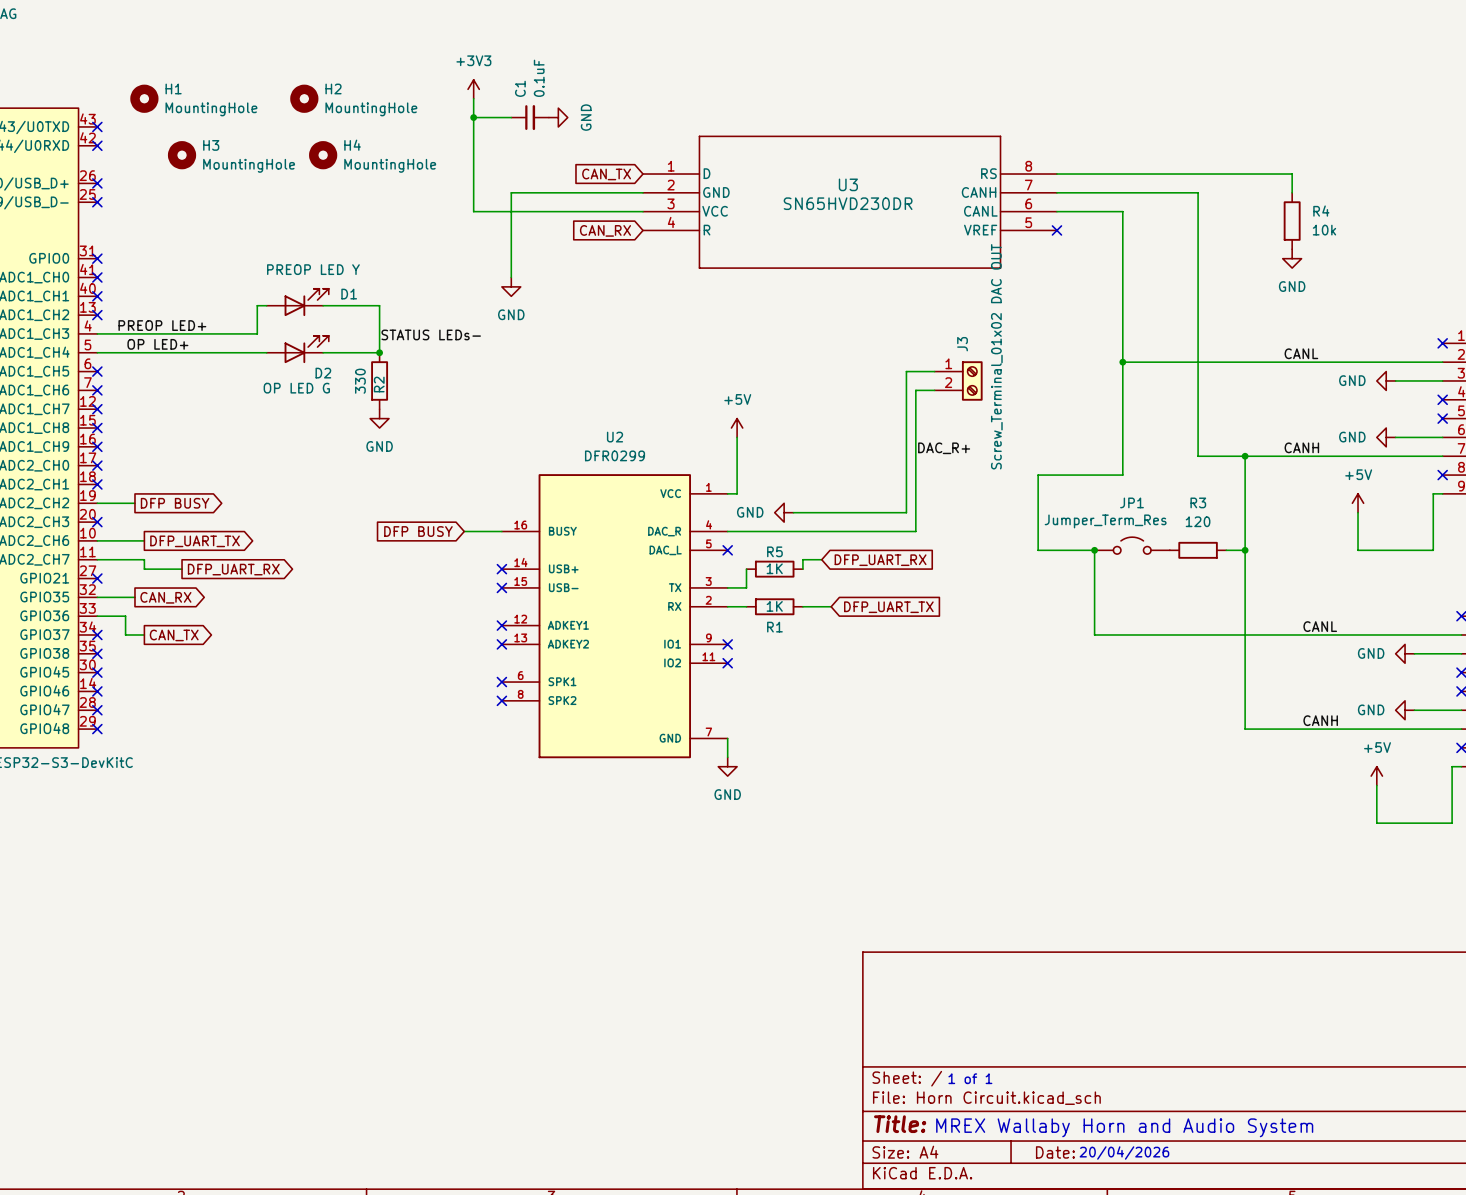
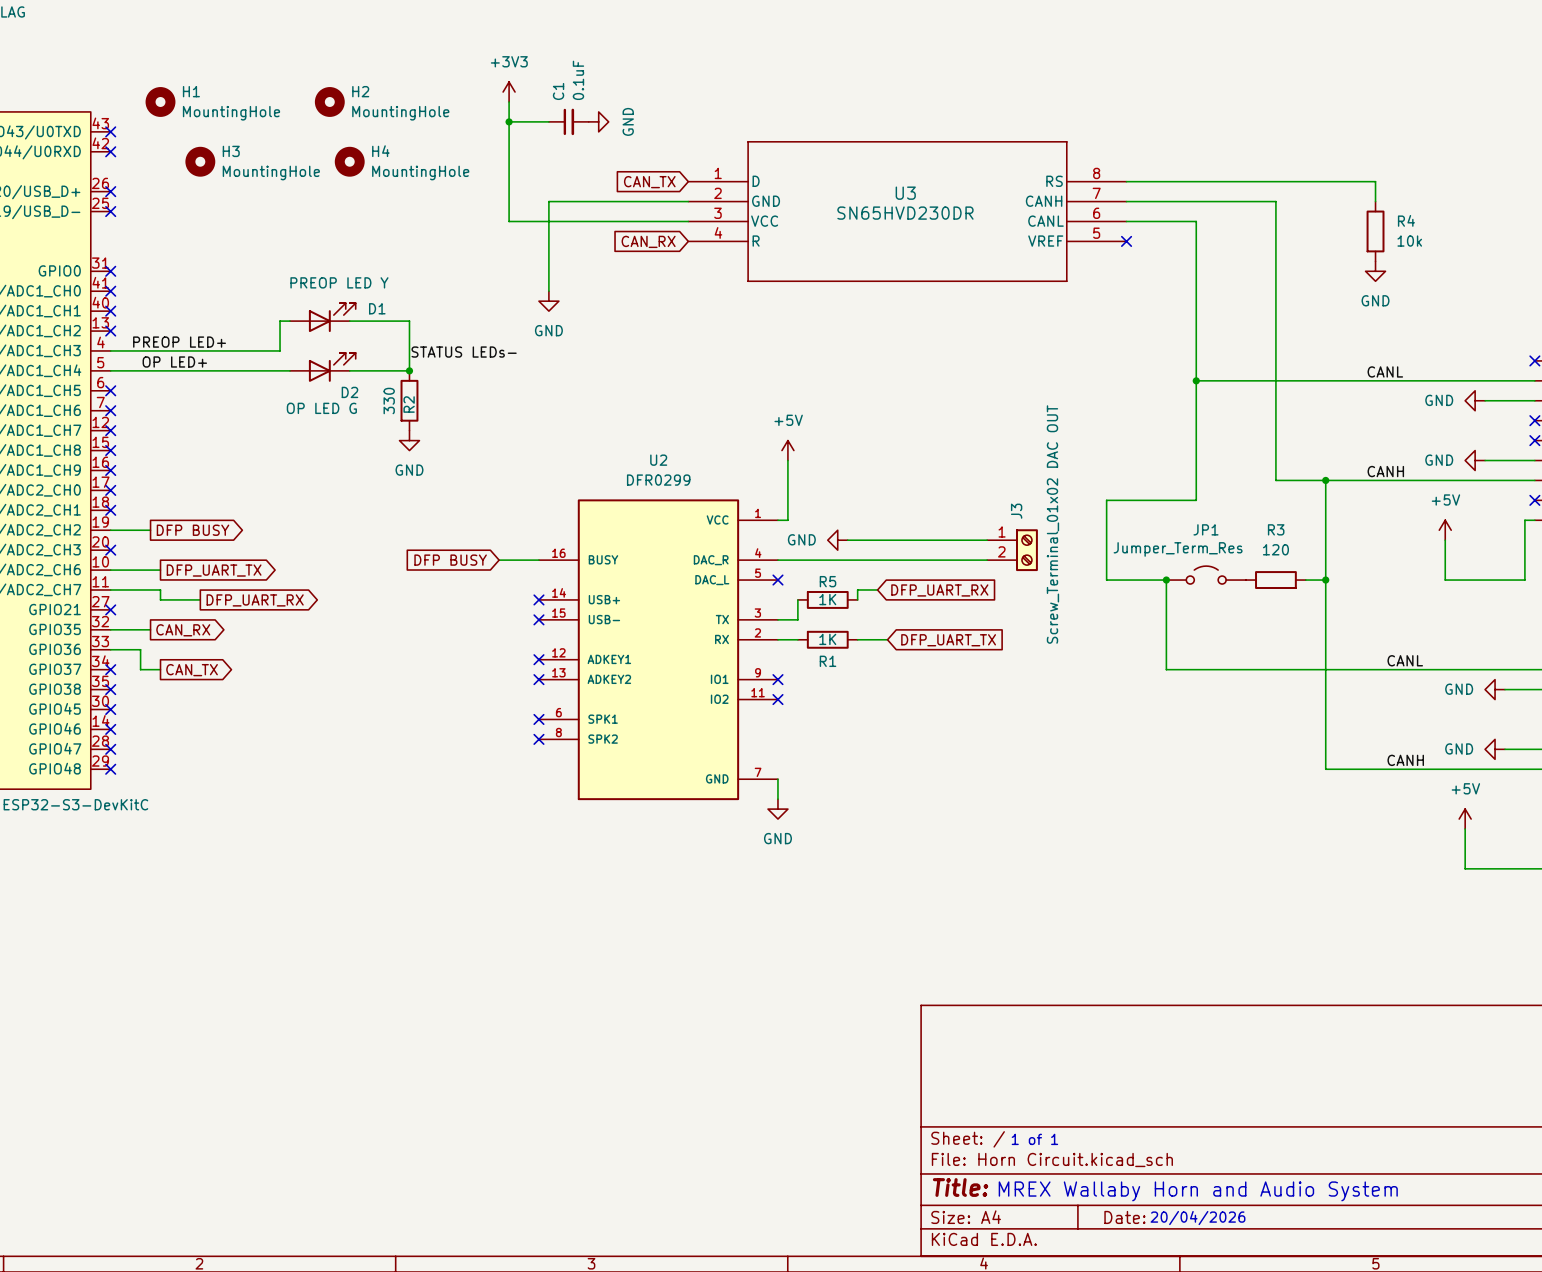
wire: (934, 371) (906, 371) (906, 512) -> (987, 540) (967, 540)
J3 position: (958, 380) -> (1012, 550)
wire: (934, 390) (915, 390) (915, 531) -> (987, 560) (977, 560)
label: DAC_R+ (944, 448) -> none

